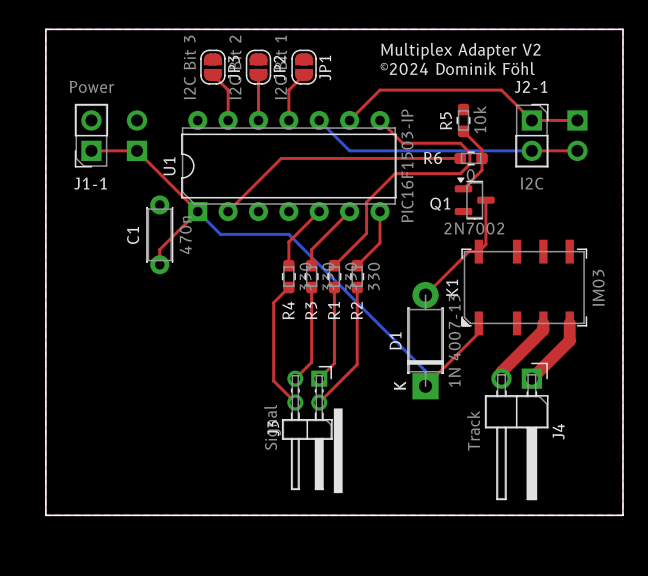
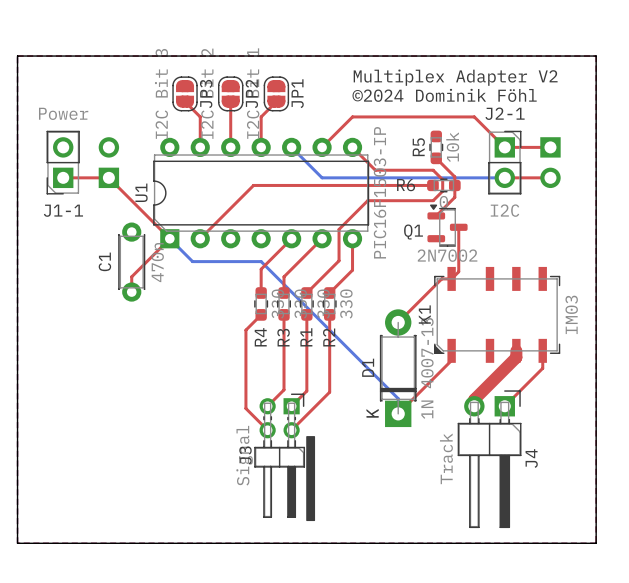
top track width: thick (569, 323) (569, 340) (531, 378) -> thin (542, 350) (542, 368) (504, 406)

